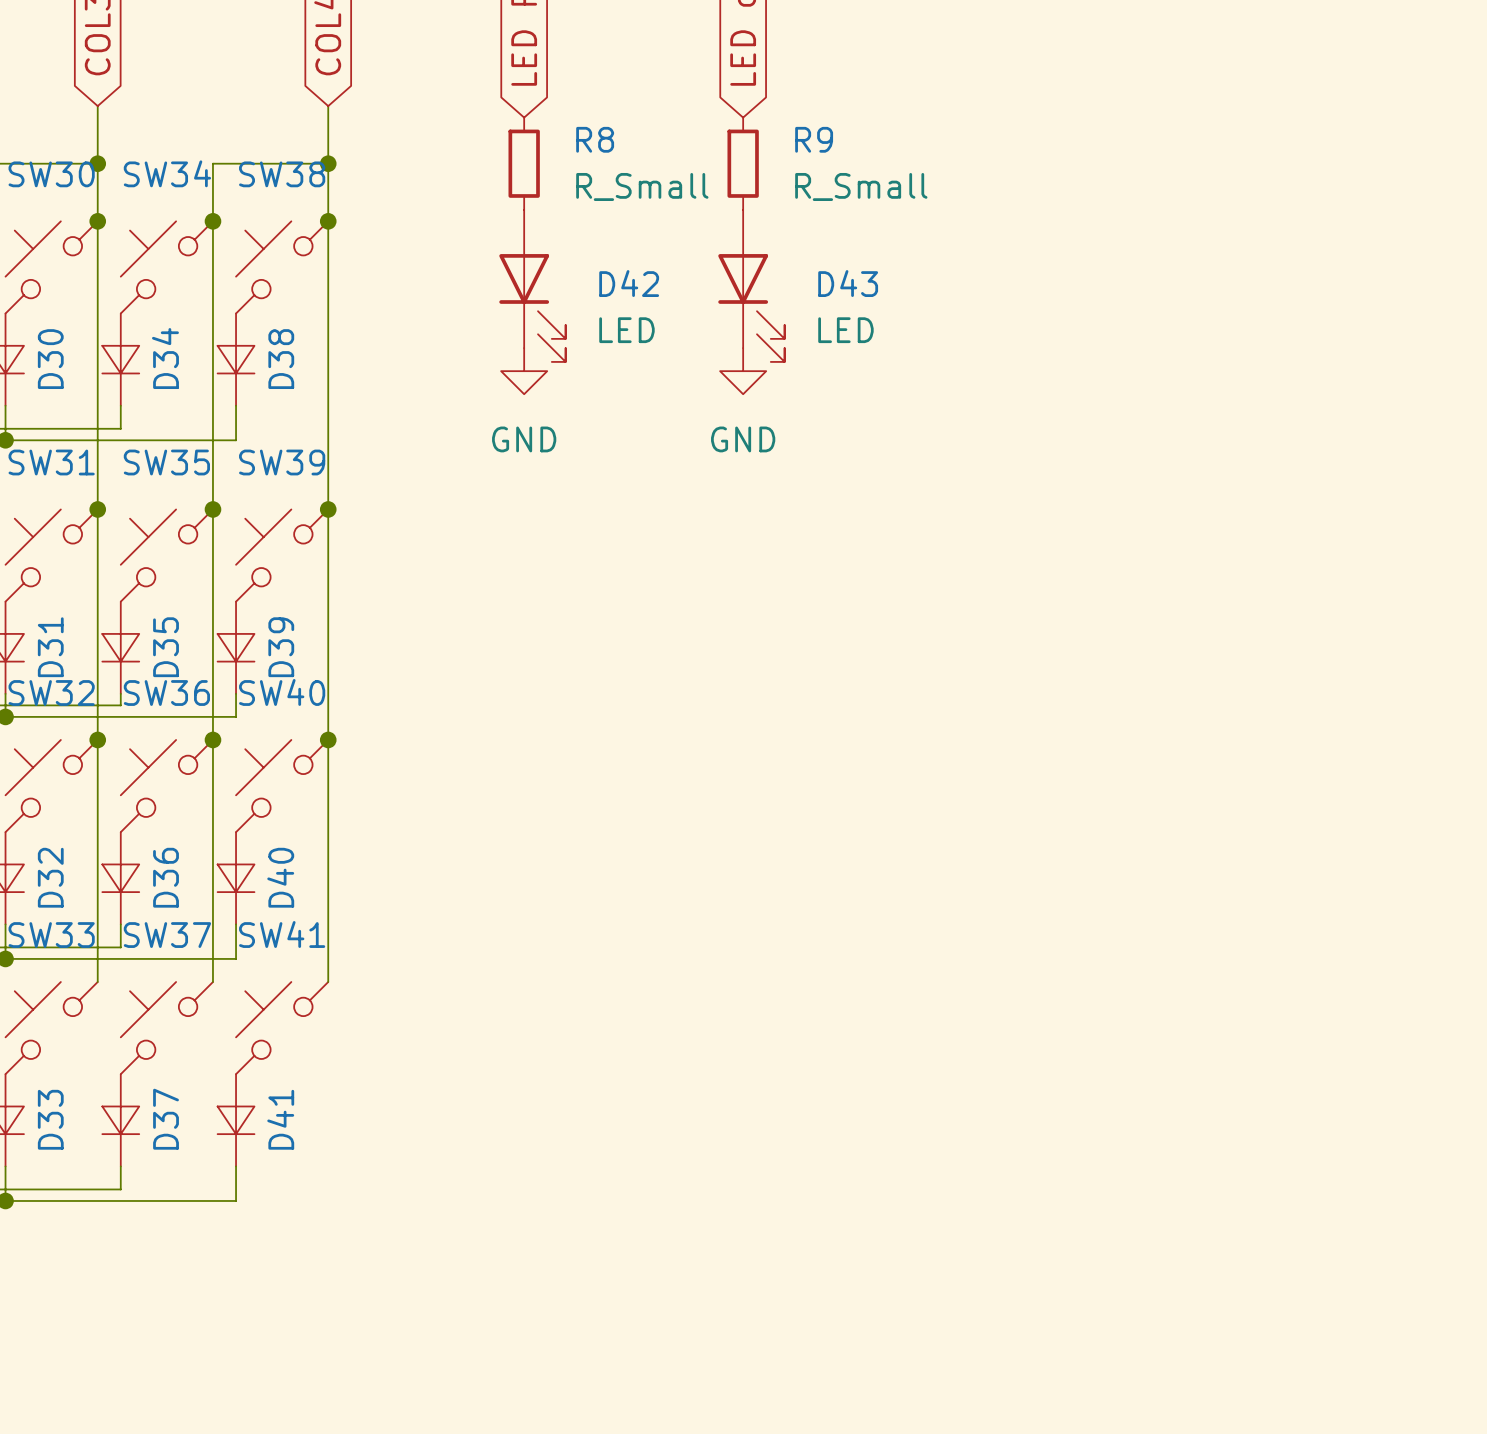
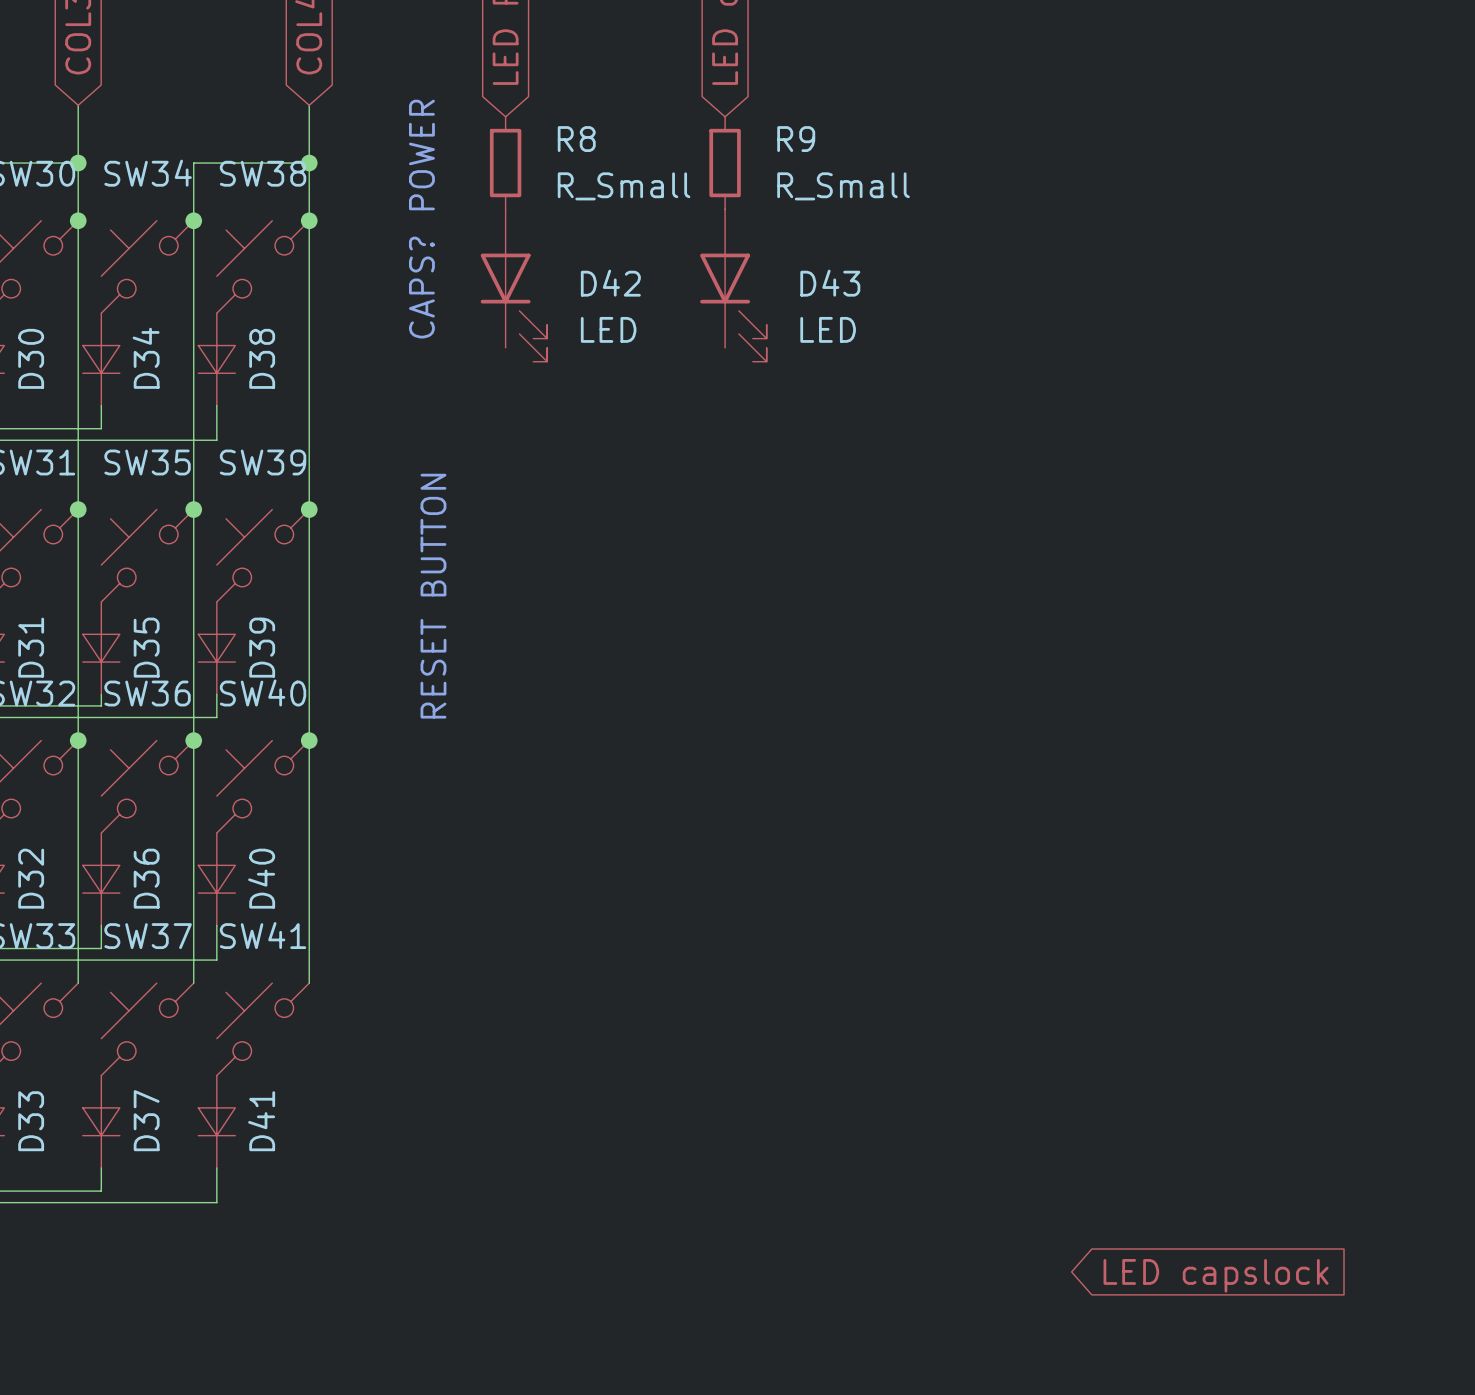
text: none -> POWER (421, 155)
text: none -> CAPS? (421, 287)
power symbol: GND (524, 371) -> none
power symbol: GND (743, 371) -> none
text: none -> RESET BUTTON (433, 596)
global label: none -> LED capslock (1216, 1275)

